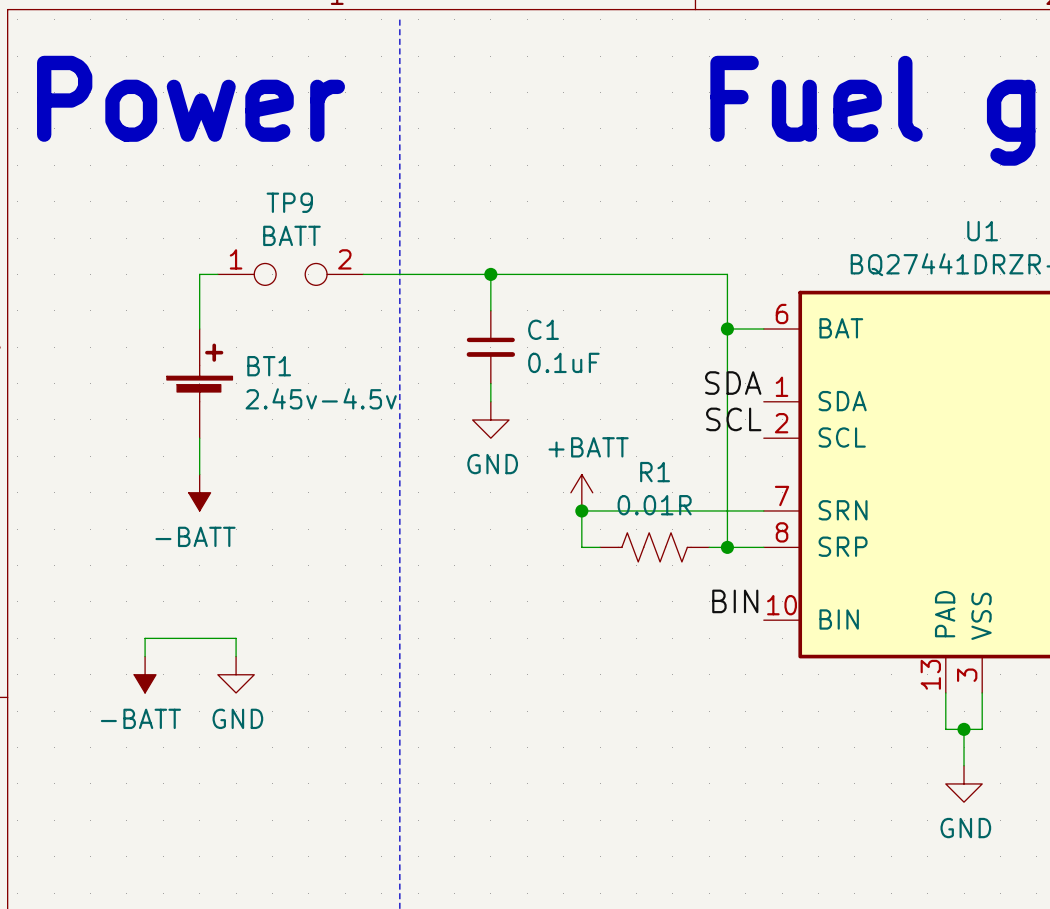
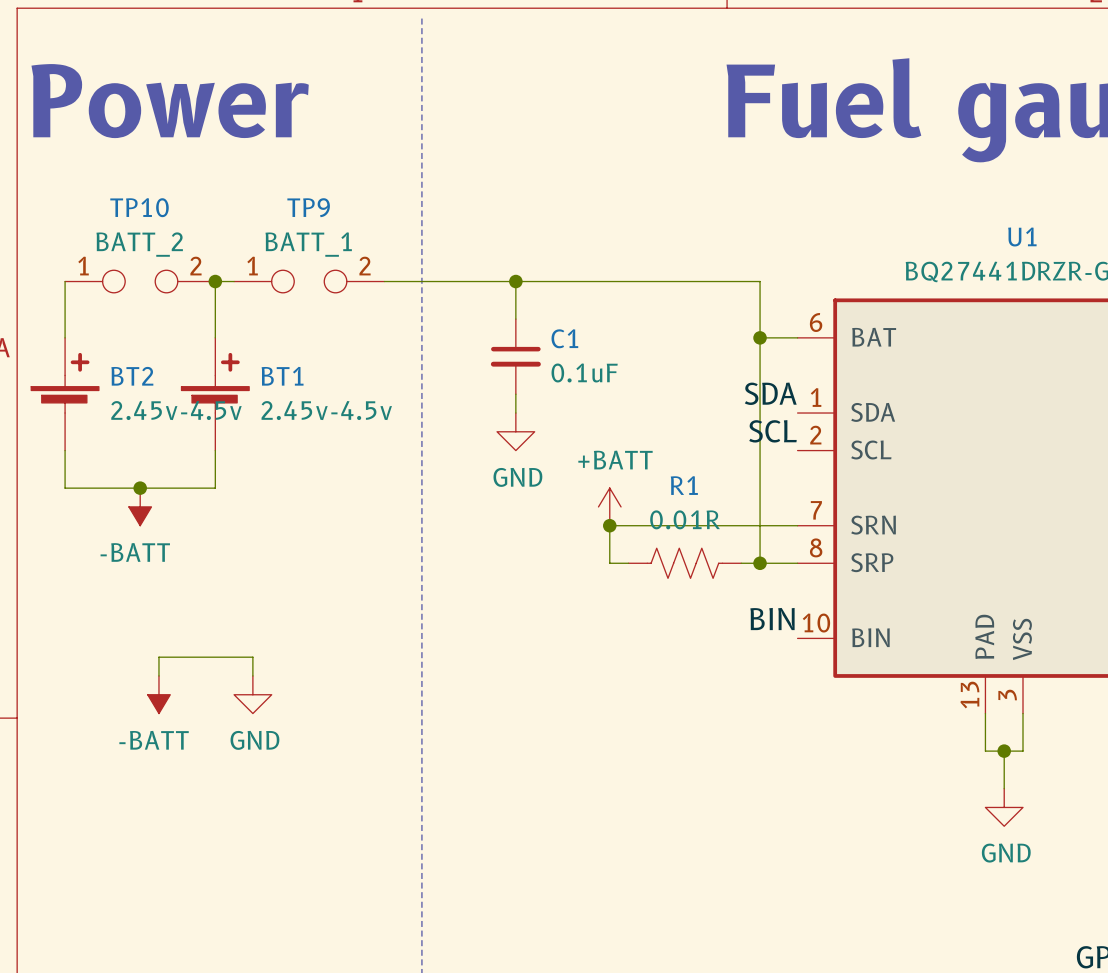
TP9 value: BATT (291, 235) -> BATT_1 (308, 244)
wire: none -> (65, 281) (65, 337)
TP10: none -> BATT_2 (140, 281)
junction: none -> (215, 281)
BT2: none -> 2.45v-4.5v (65, 394)
wire: none -> (65, 450) (65, 488) (215, 488)
junction: none -> (140, 488)
power symbol position: -BATT (199, 492) -> -BATT (140, 506)

